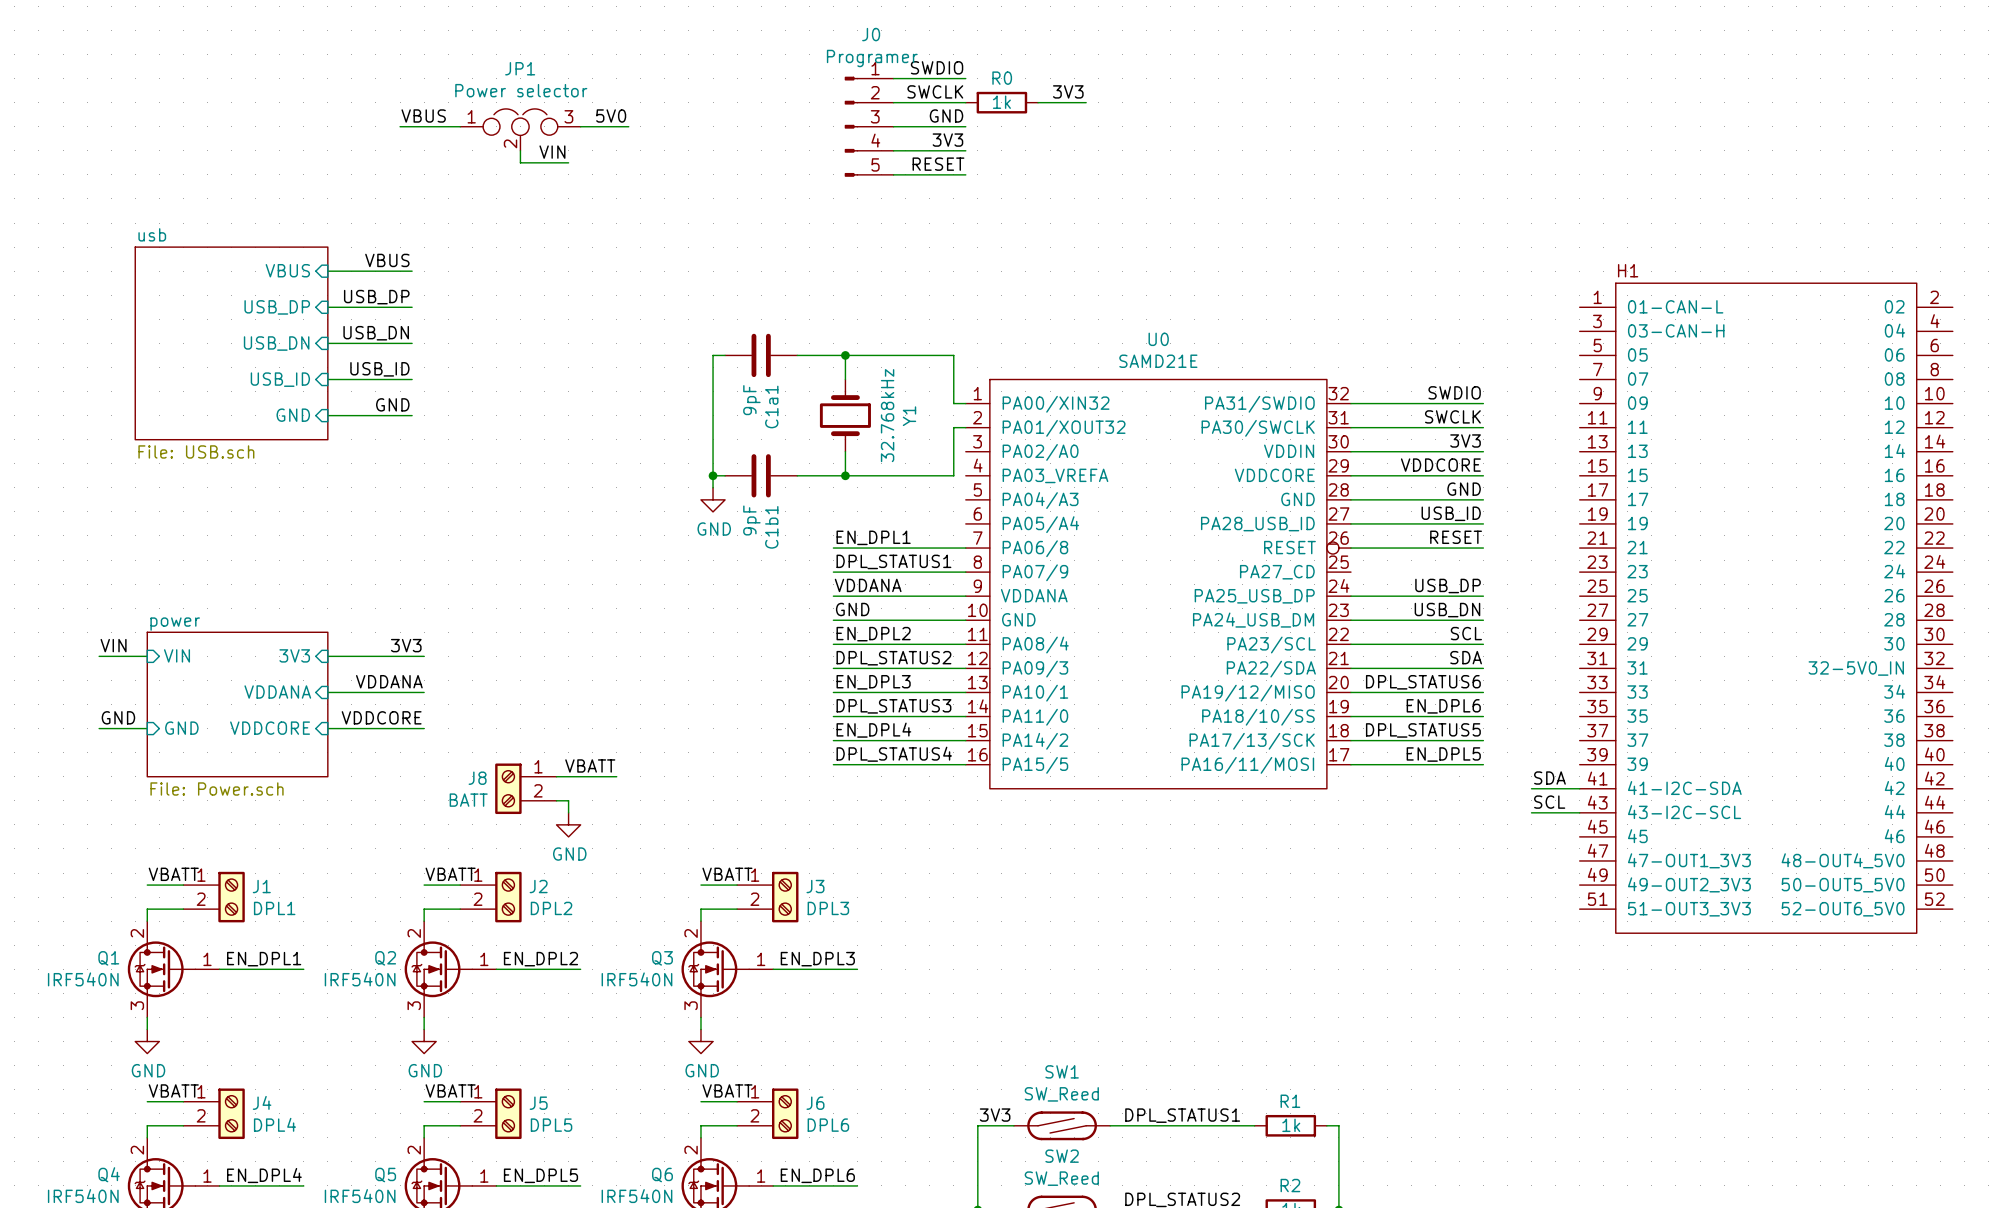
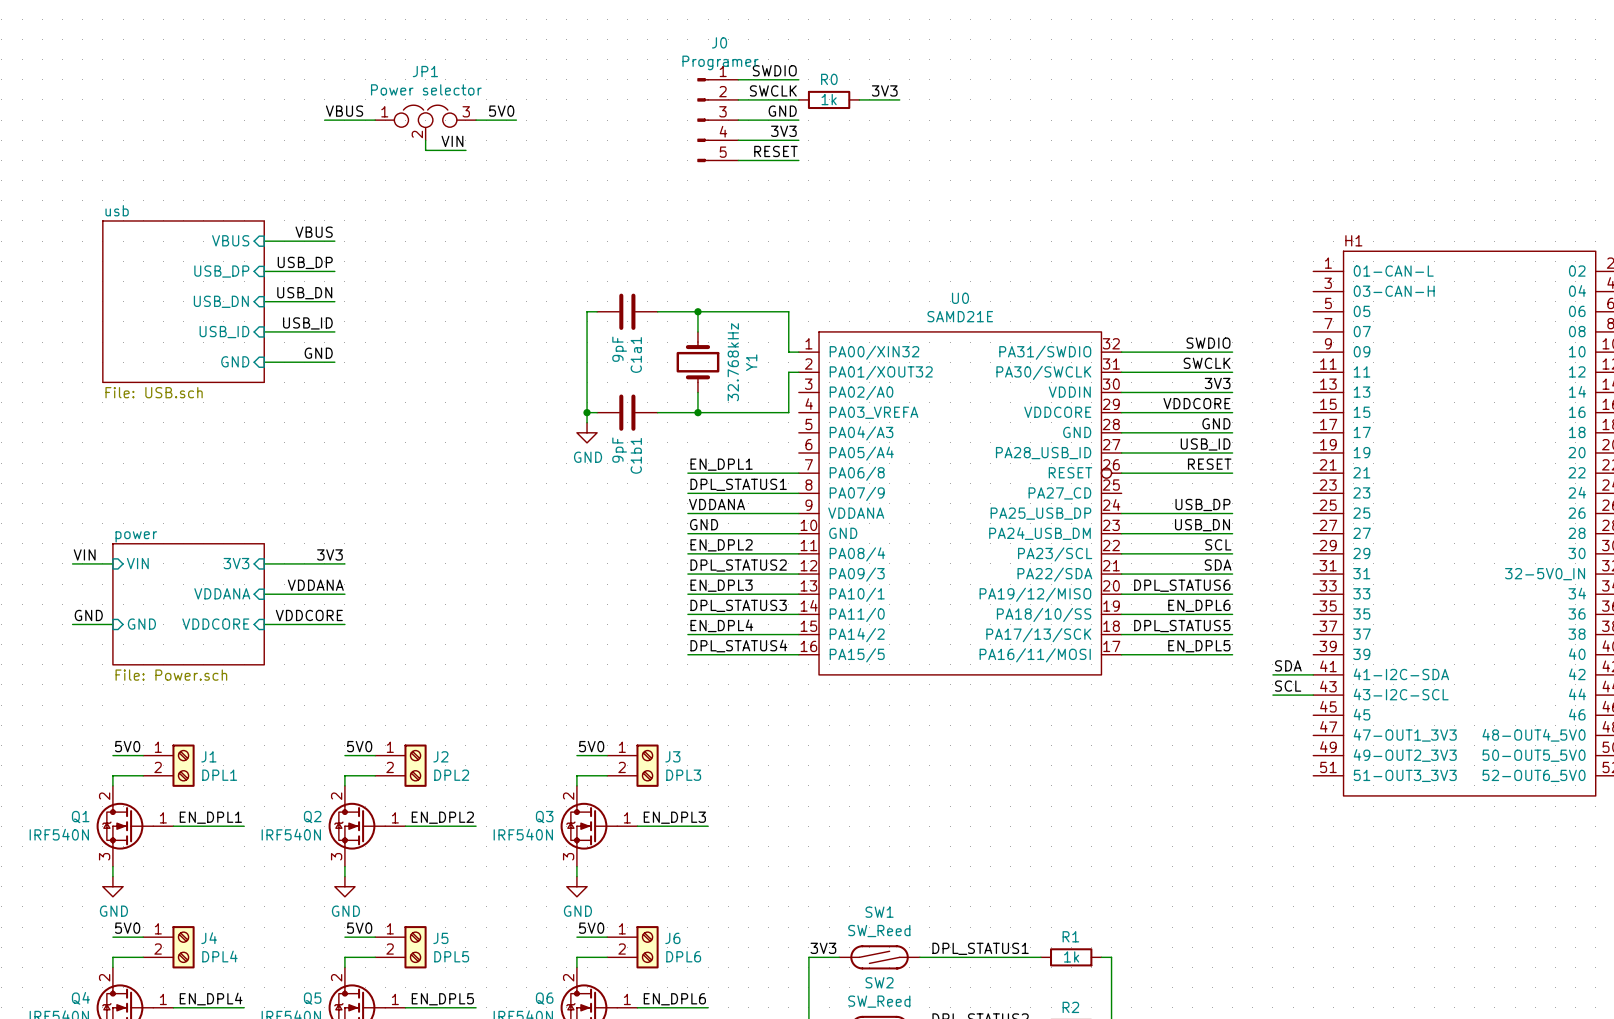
label: VBATT (590, 765) -> none
wire: (556, 776) (616, 776) -> none
J8: BATT (525, 788) -> none
wire: (556, 800) (568, 800) (568, 812) -> none
power symbol: GND (568, 824) -> none
label: VBATT (173, 874) -> 5V0 (127, 746)
label: VBATT (450, 874) -> 5V0 (359, 746)
label: VBATT (727, 874) -> 5V0 (591, 746)
label: VBATT (173, 1090) -> 5V0 (127, 928)
label: VBATT (450, 1090) -> 5V0 (359, 928)
label: VBATT (727, 1090) -> 5V0 (591, 928)

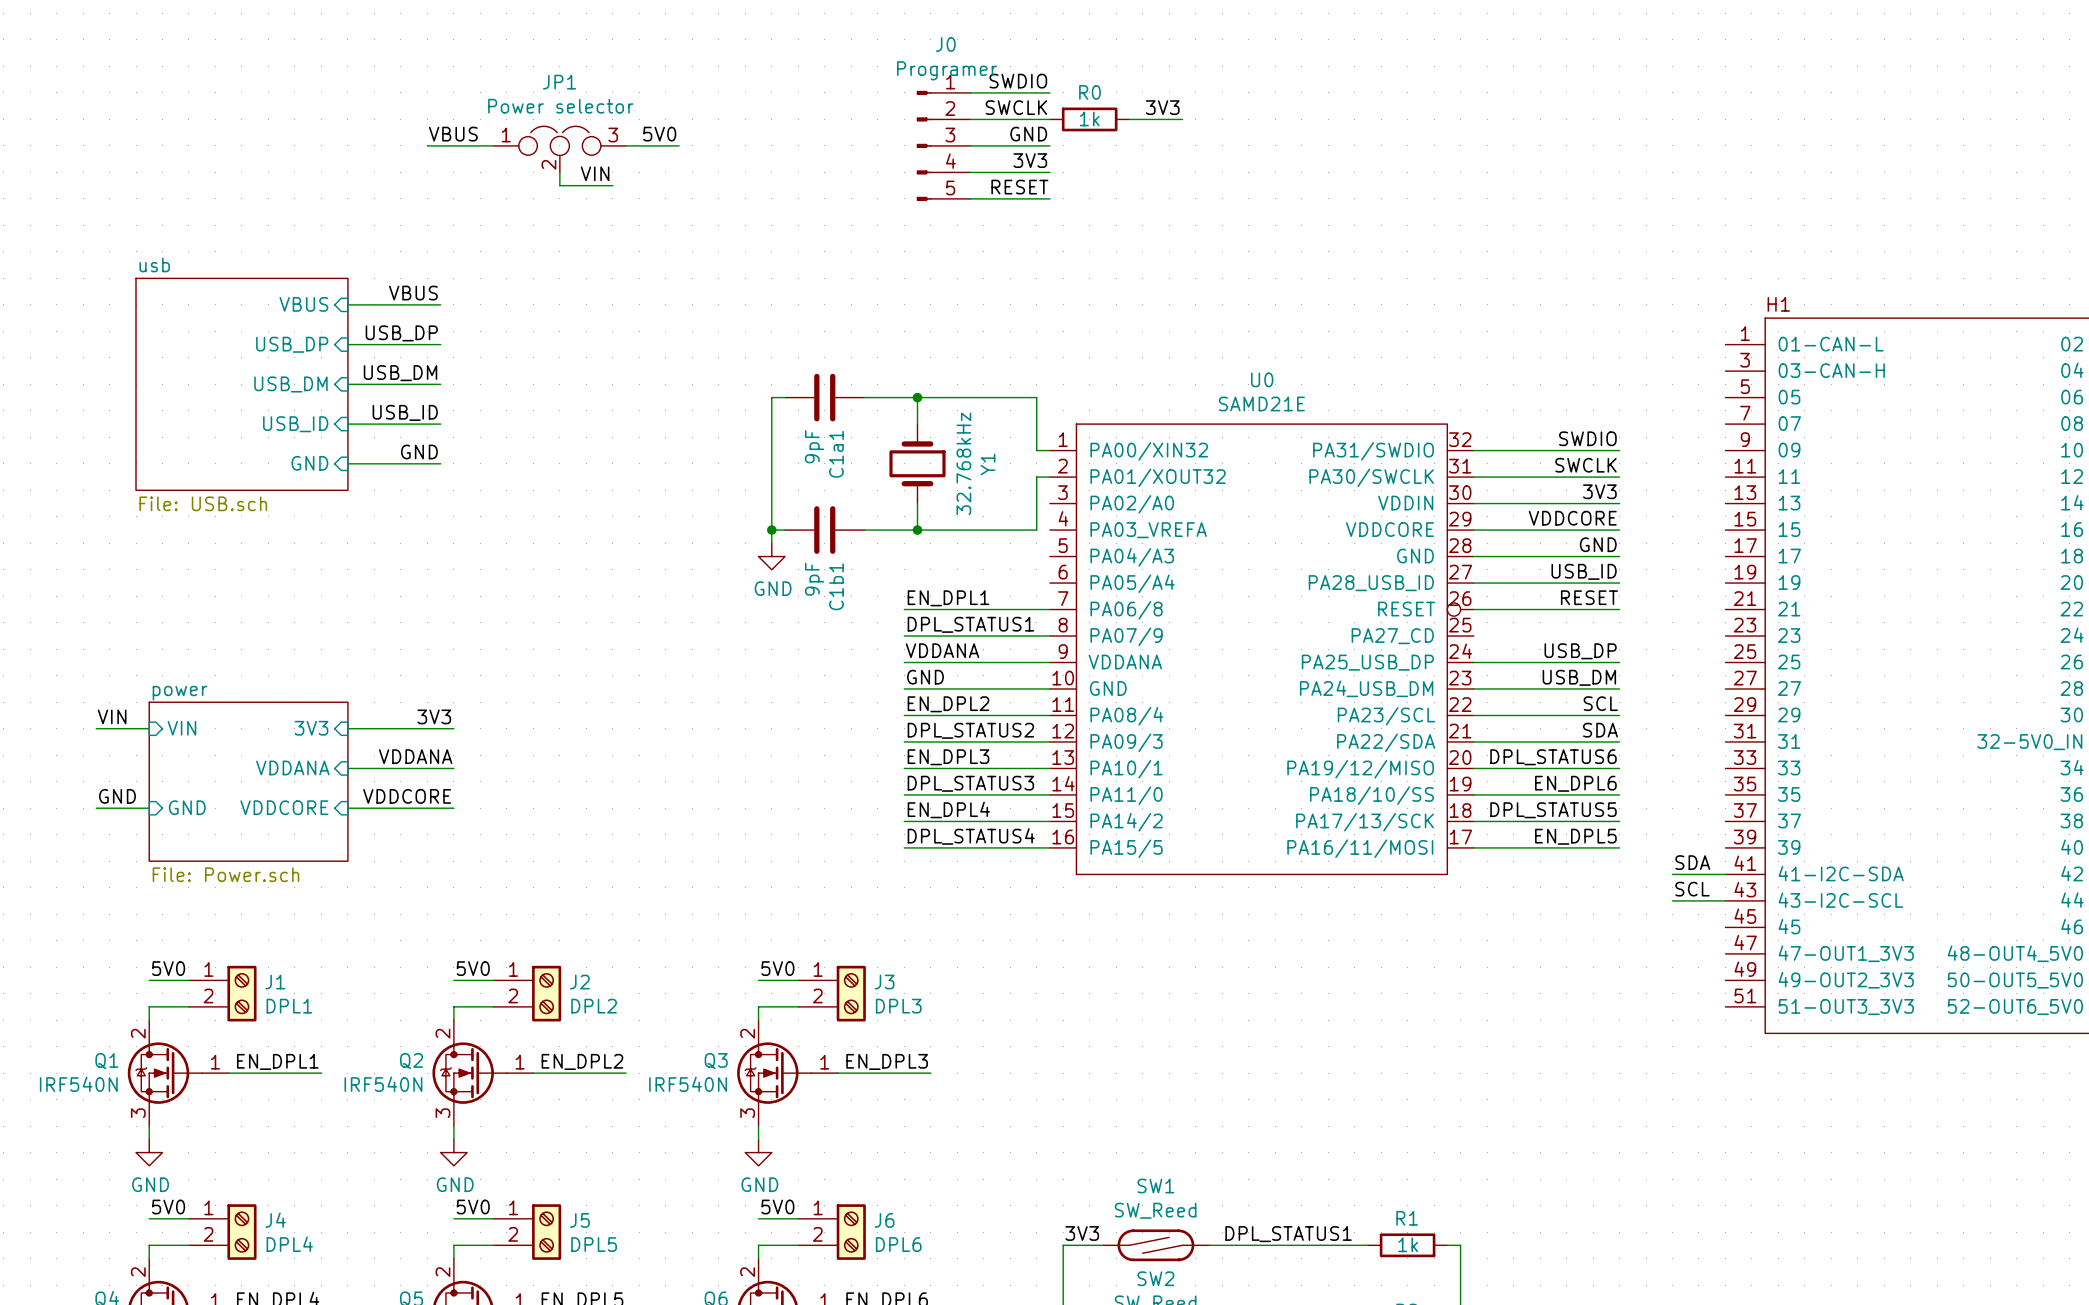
label: USB_DN (304, 293) -> USB_DM (400, 373)
sheet pin: USB_DN (221, 301) -> USB_DM (290, 384)
label: USB_DN (1202, 525) -> USB_DM (1579, 677)

